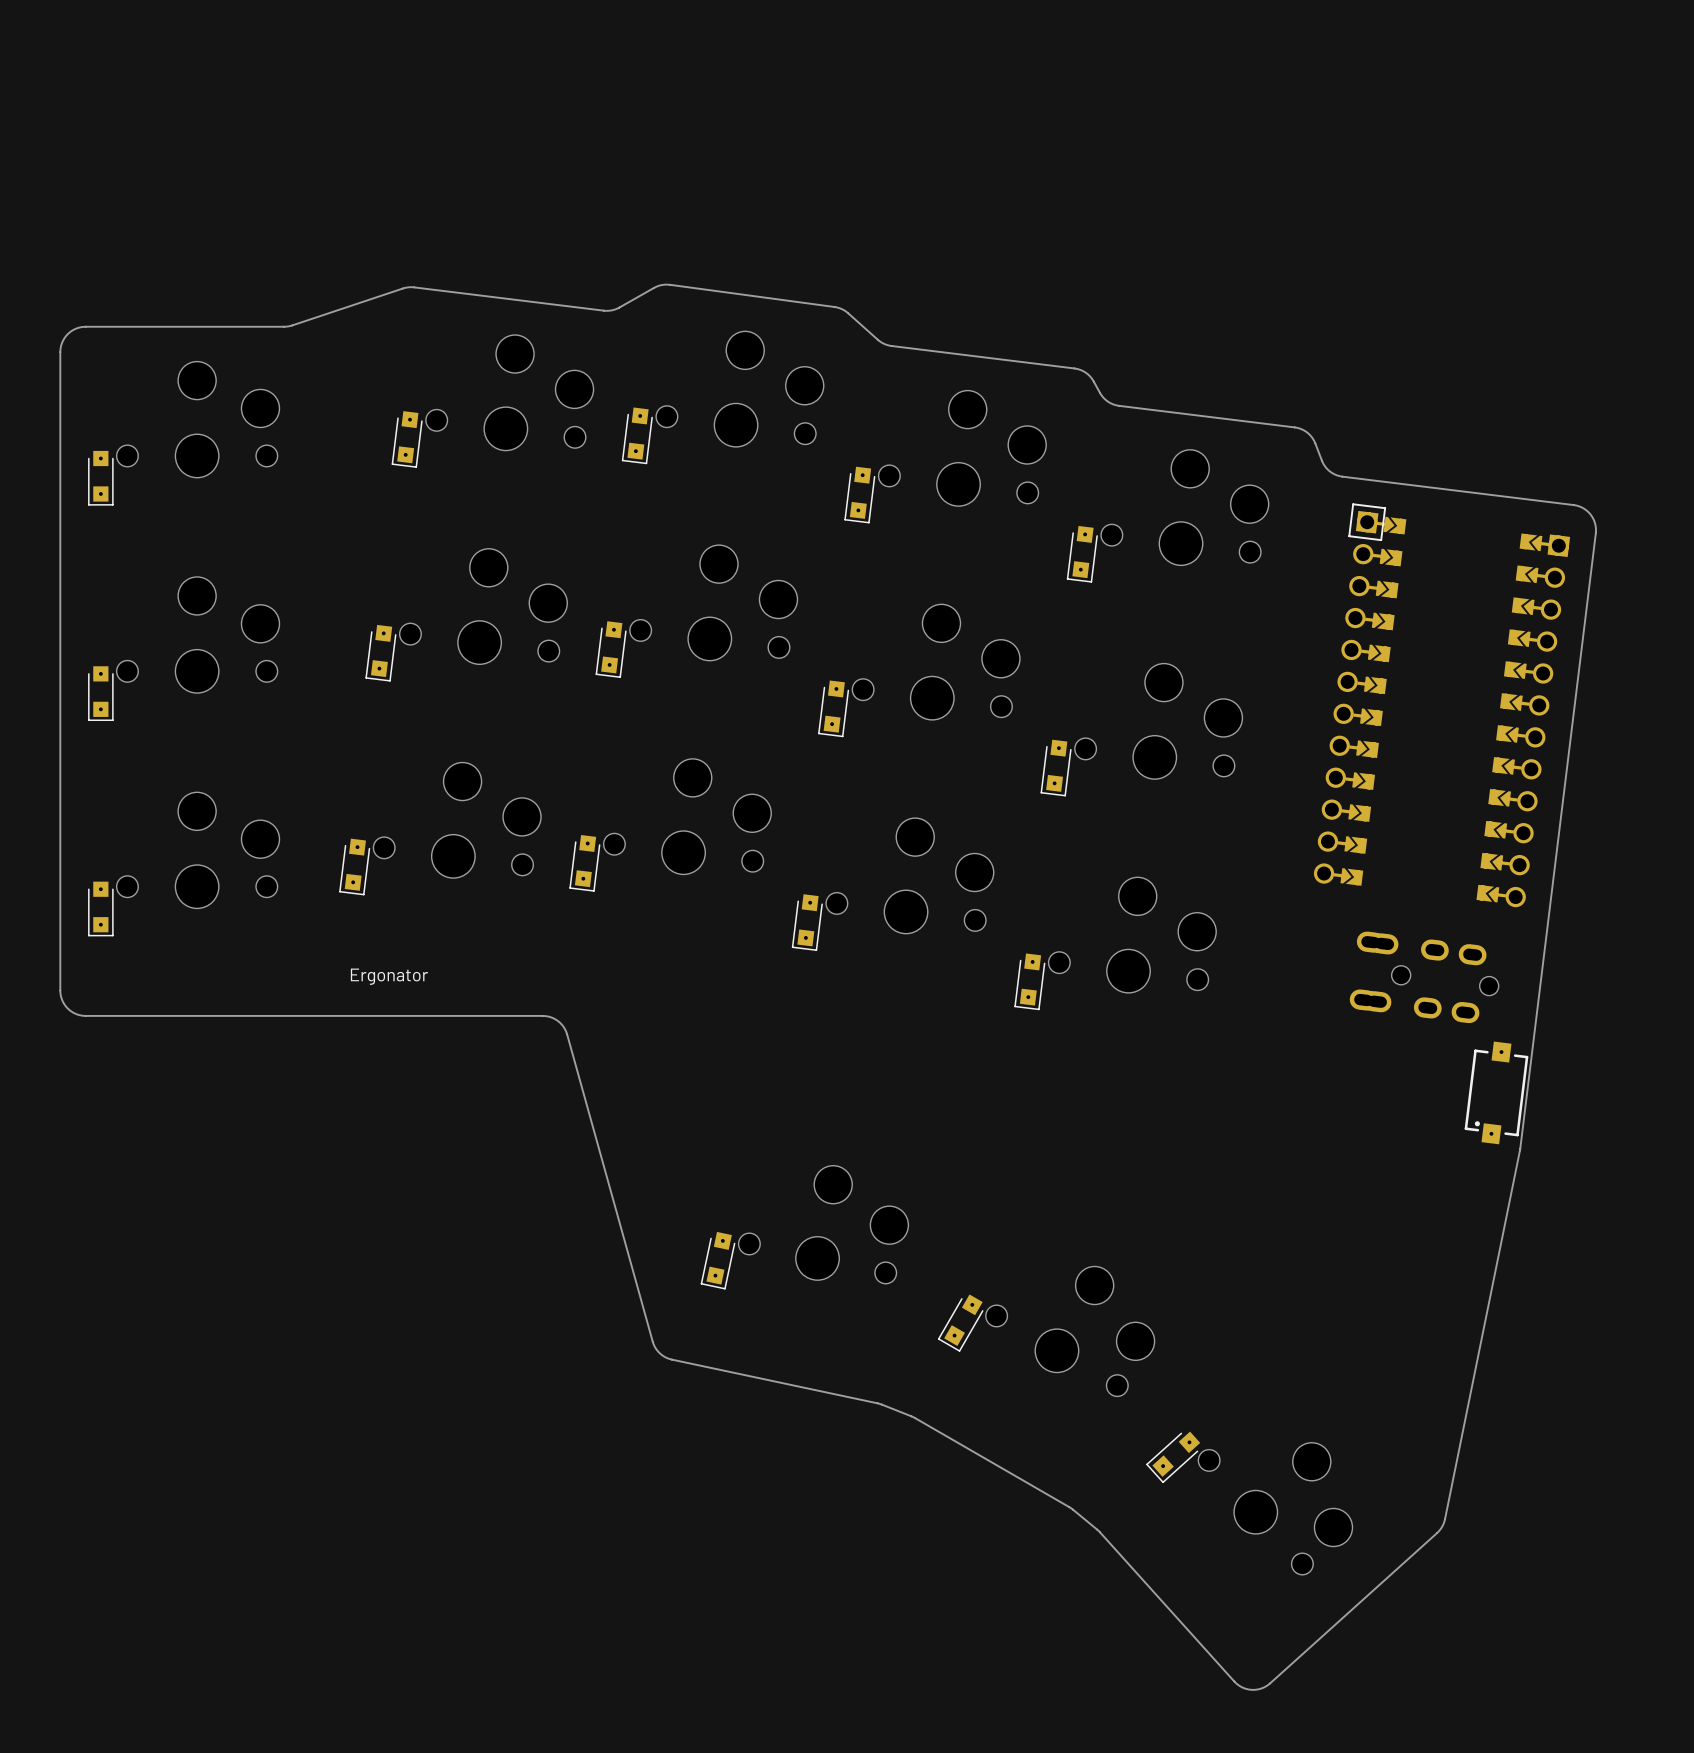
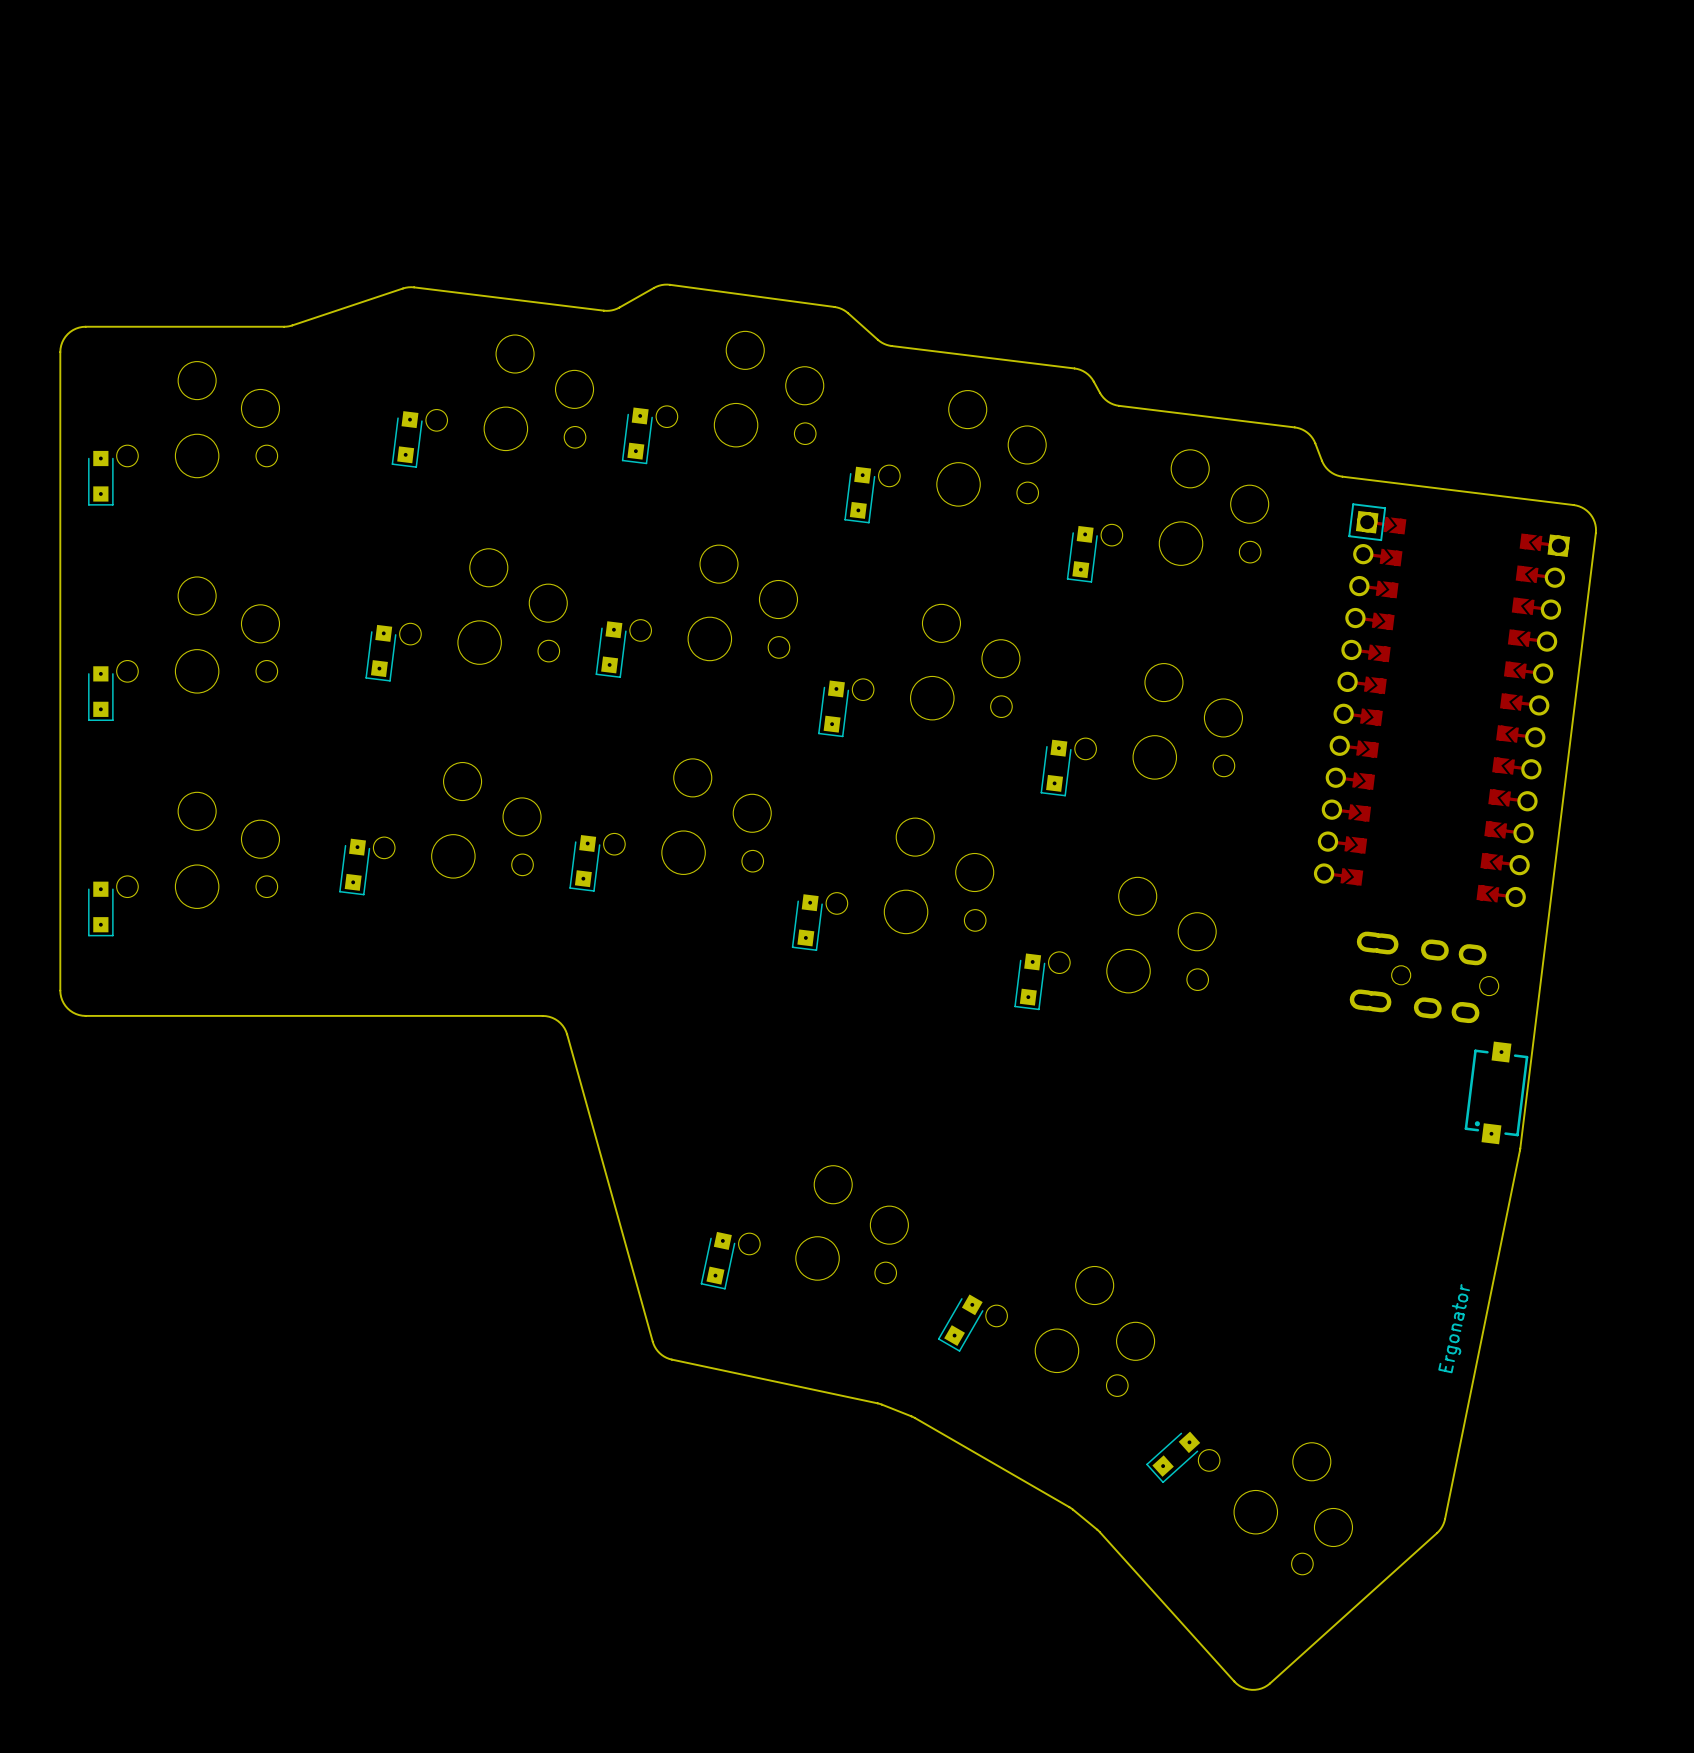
text: Ergonator (389, 976) -> none
text: none -> Ergonator (1454, 1328)

